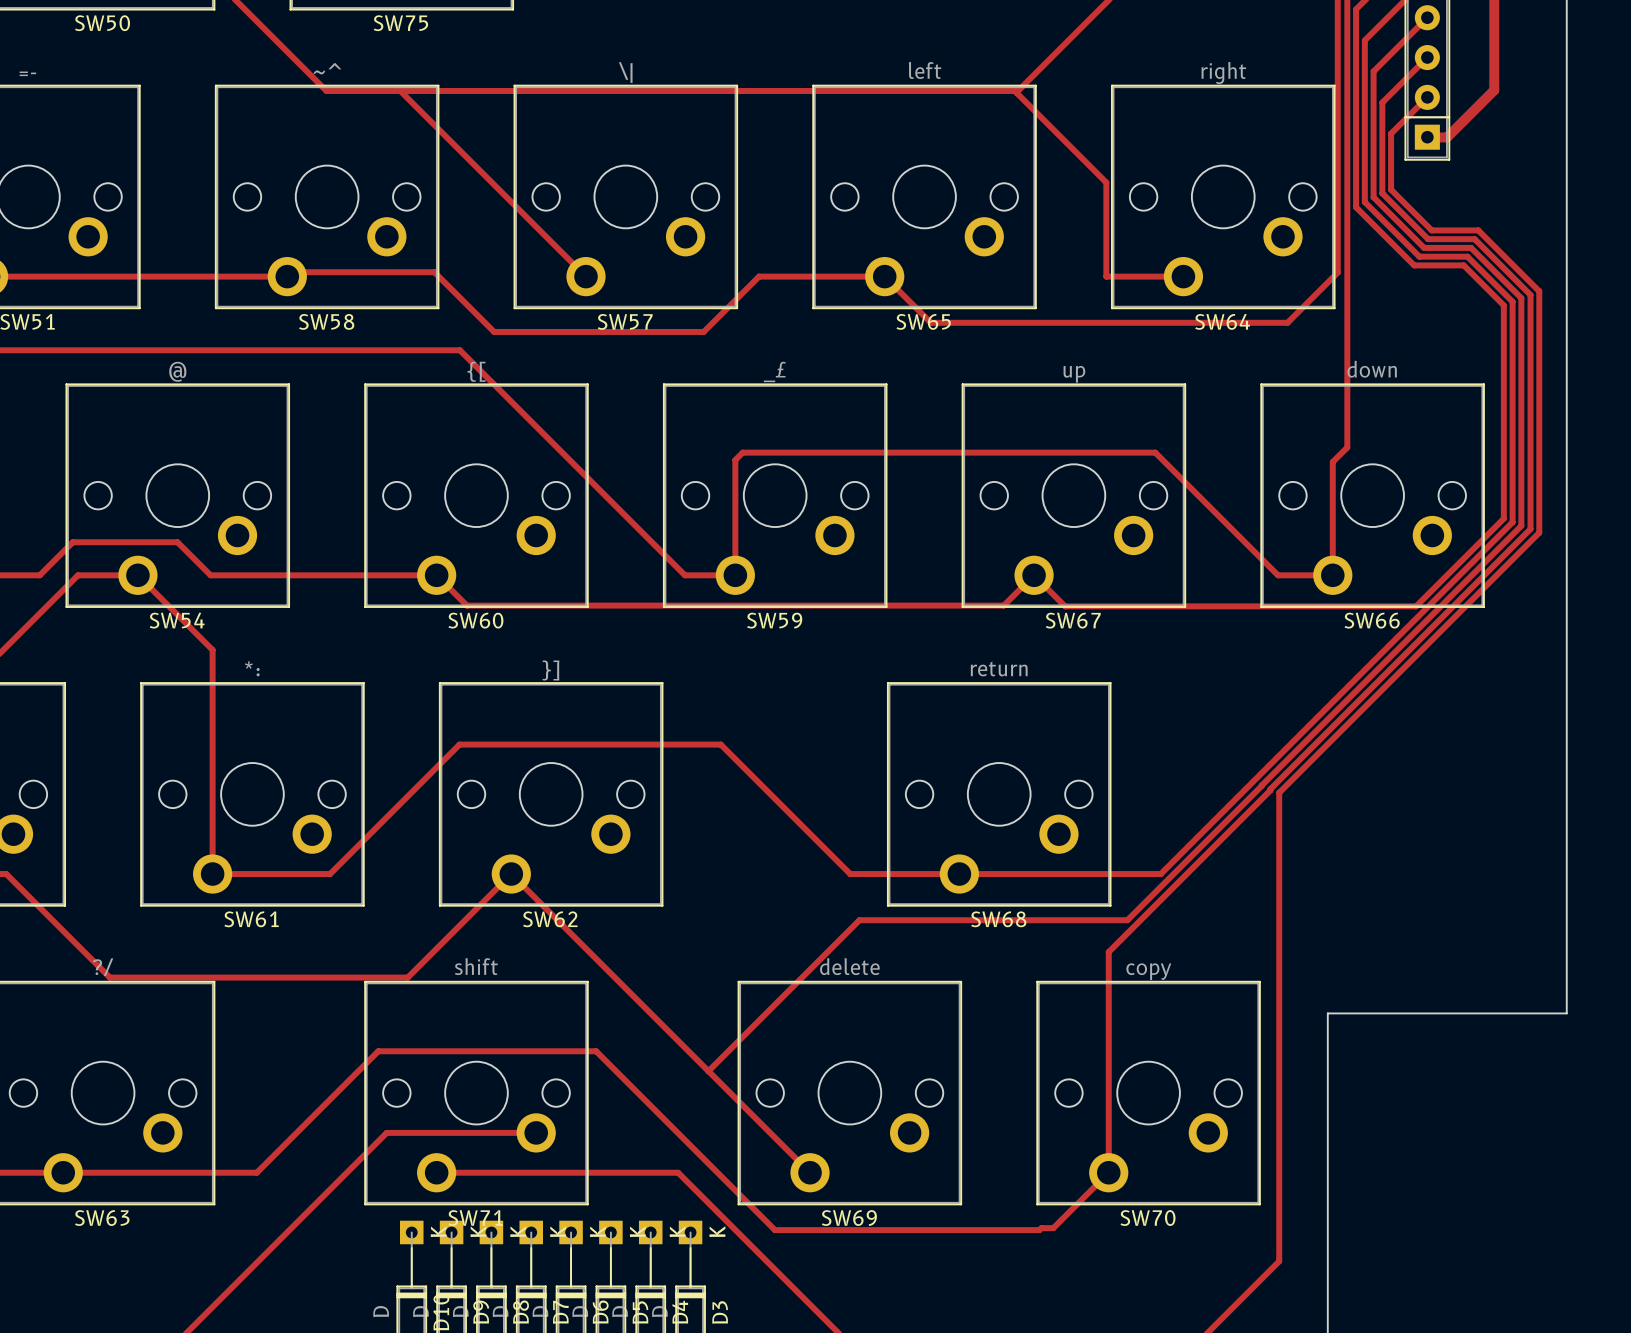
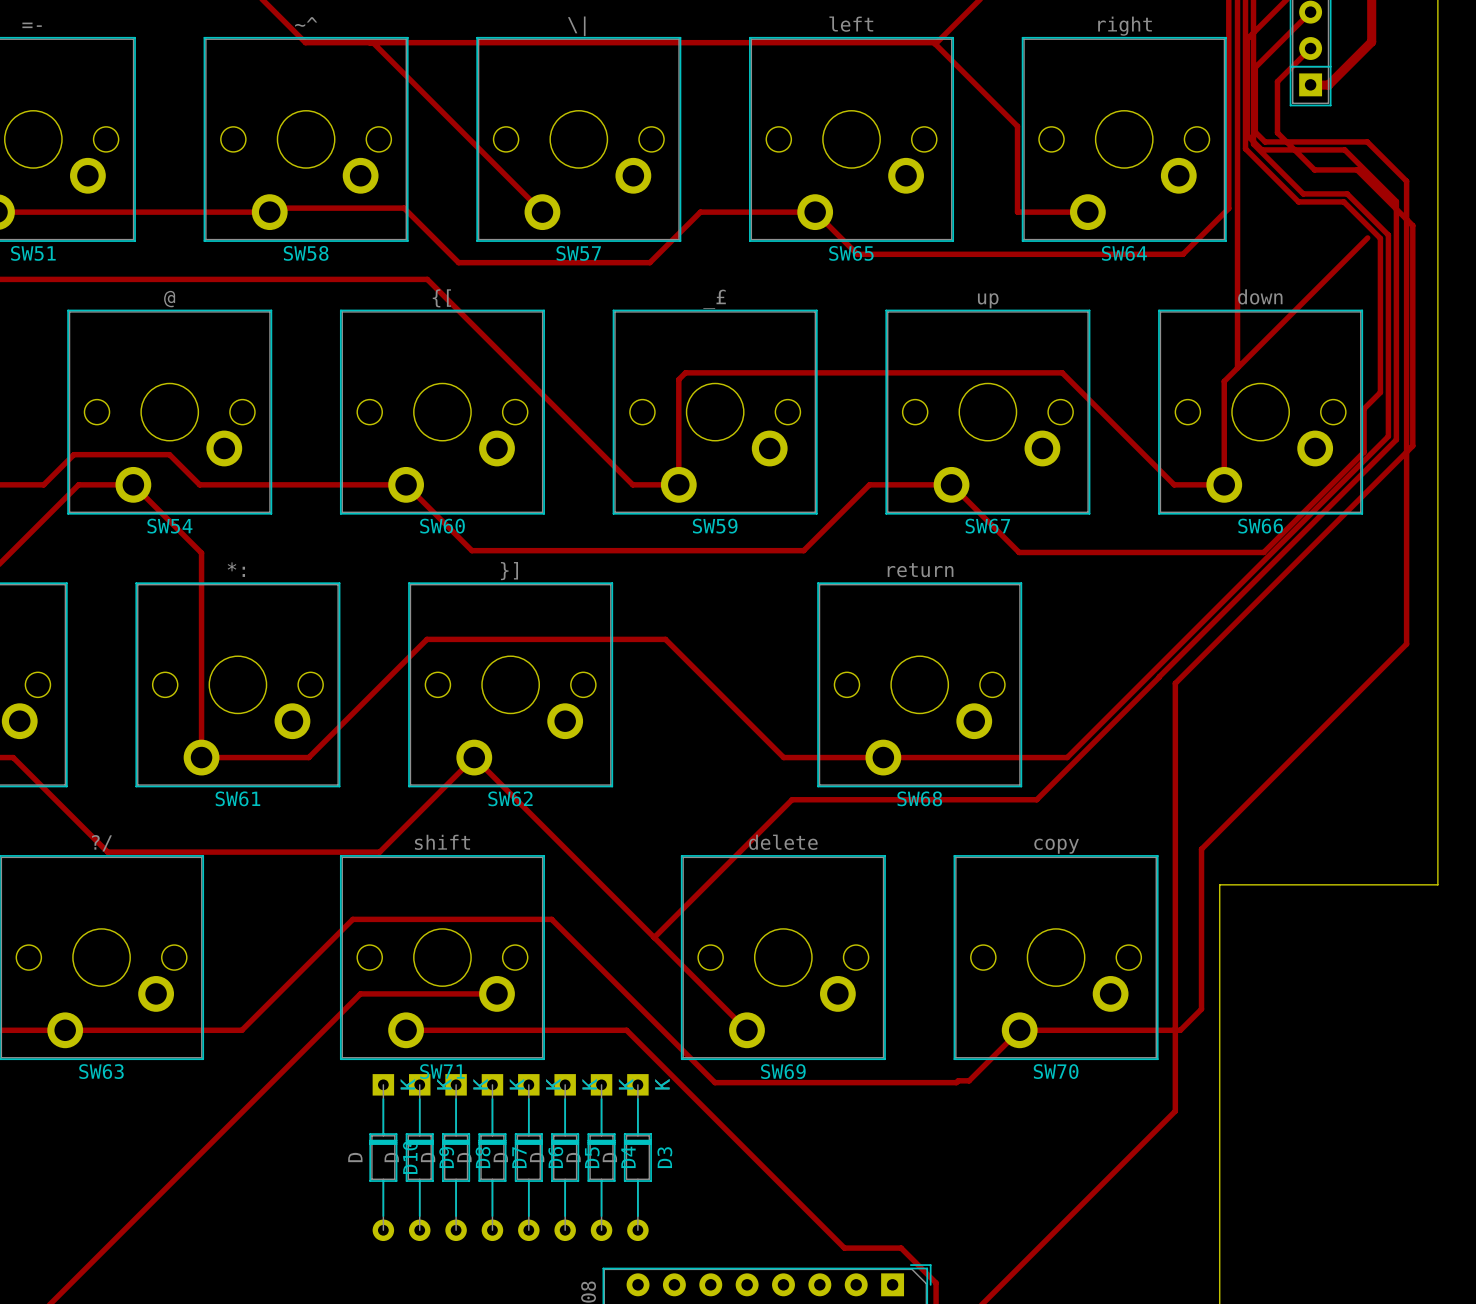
track: (1373, 71) (1373, 197) (1424, 247) (1471, 247) (1521, 298) -> (1261, 24) (1247, 39) (1247, 135) (1261, 149) (1344, 149) (1396, 201) (1396, 231)
track: (1382, 102) (1382, 193) (1428, 239) (1474, 239) (1530, 294) (1530, 529) (1108, 952) (1108, 1172) -> (1269, 53) (1255, 67) (1255, 132) (1265, 141) (1367, 141) (1406, 181) (1406, 644) (1201, 849) (1201, 1009) (1180, 1030) (1019, 1030)
track: none -> (1367, 237) (1237, 368)
track: (1503, 474) (1503, 518) (1416, 606) (1065, 606) -> (1380, 392) (1364, 408) (1364, 452) (1263, 552) (1019, 552) (979, 513)
track: (1034, 575) (1003, 605) (466, 605) -> (951, 484) (869, 484) (803, 550) (471, 550) (433, 512)

